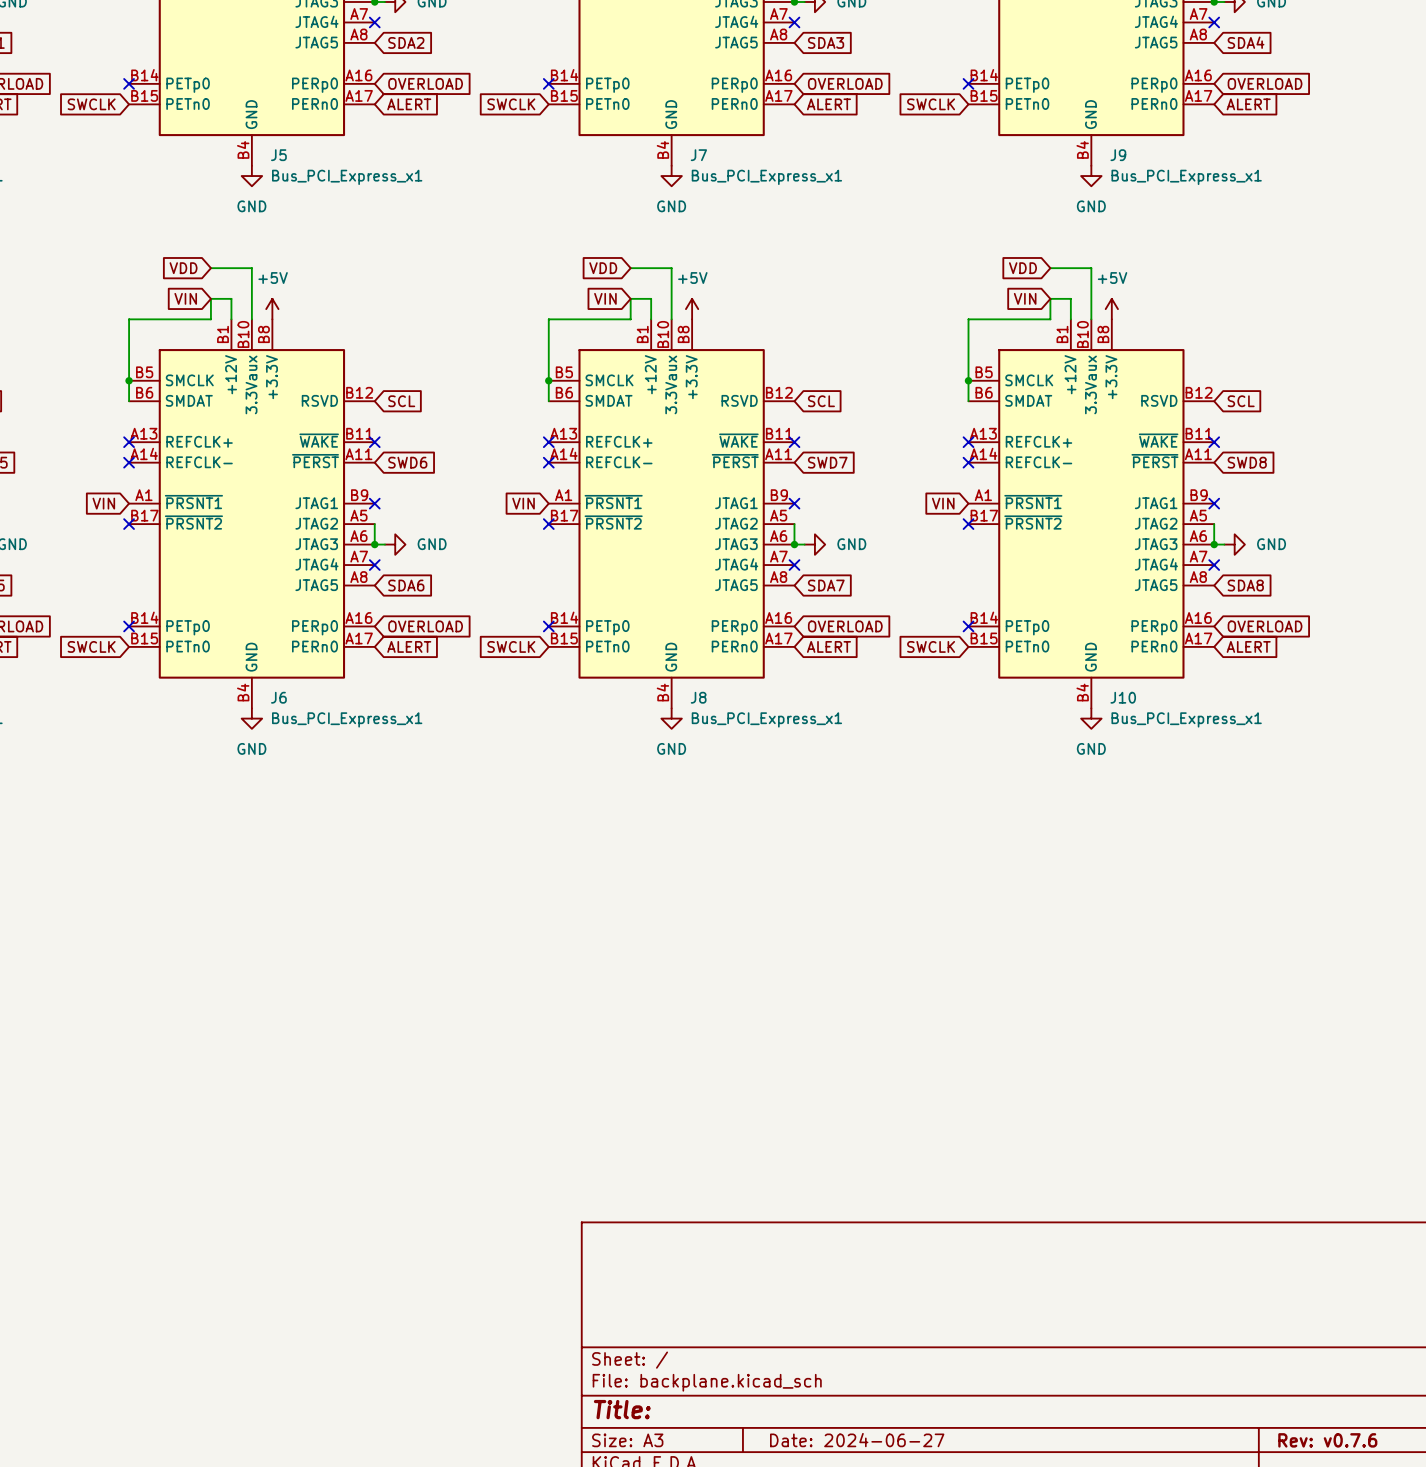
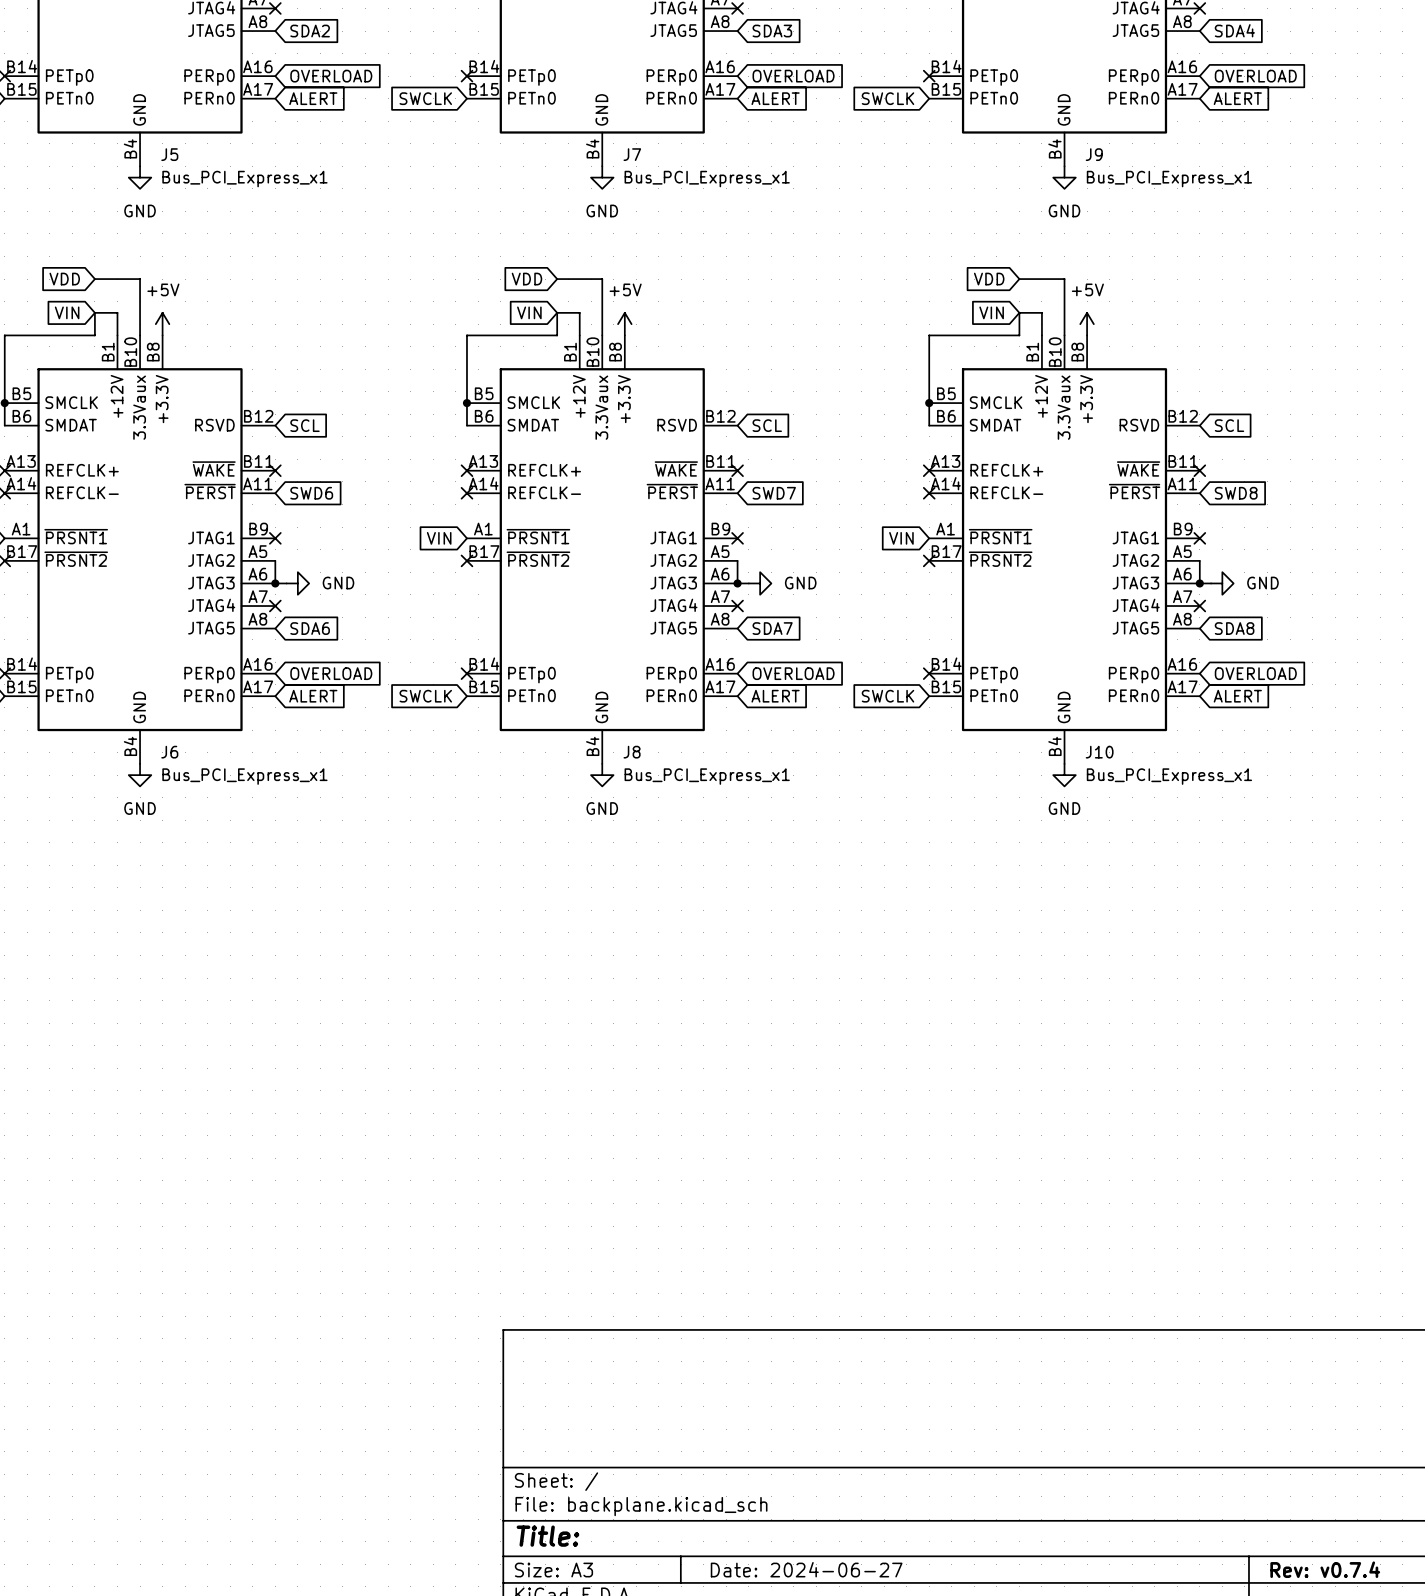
title block: Rev: v0.7.6 (1327, 1440) -> Rev: v0.7.4 (1325, 1569)

